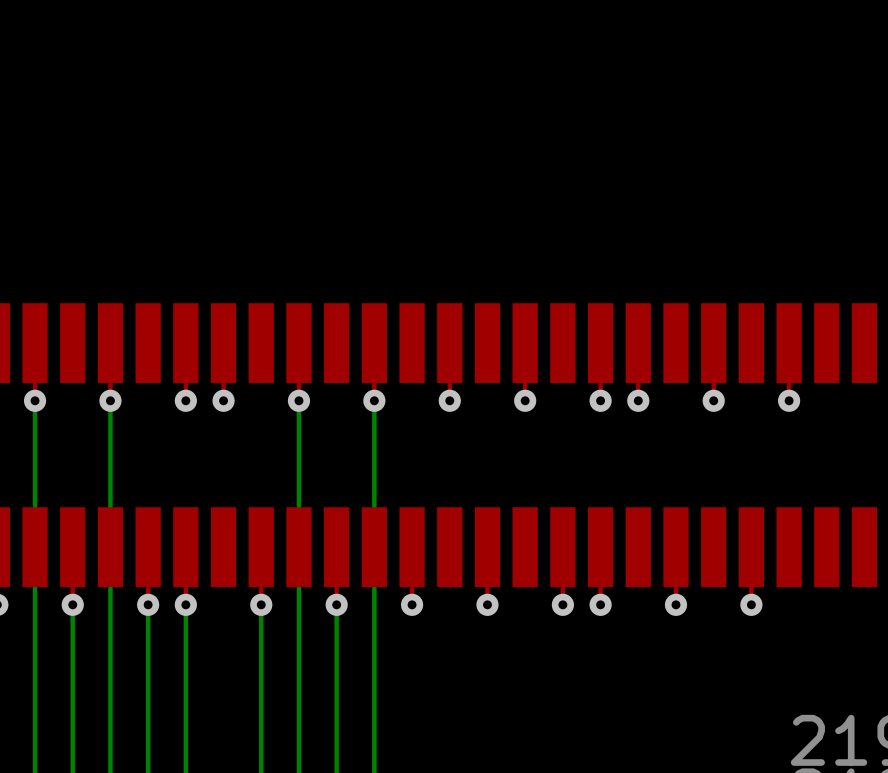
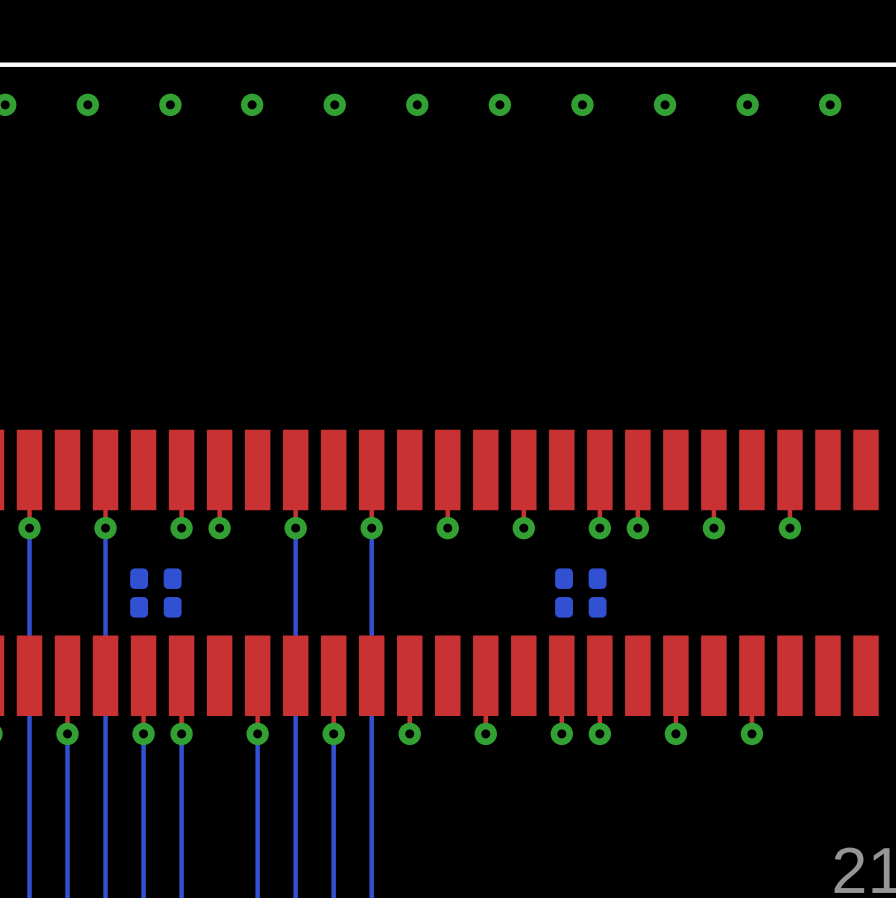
part: none -> (139, 593)
part: none -> (172, 593)
part: none -> (564, 593)
part: none -> (597, 593)

